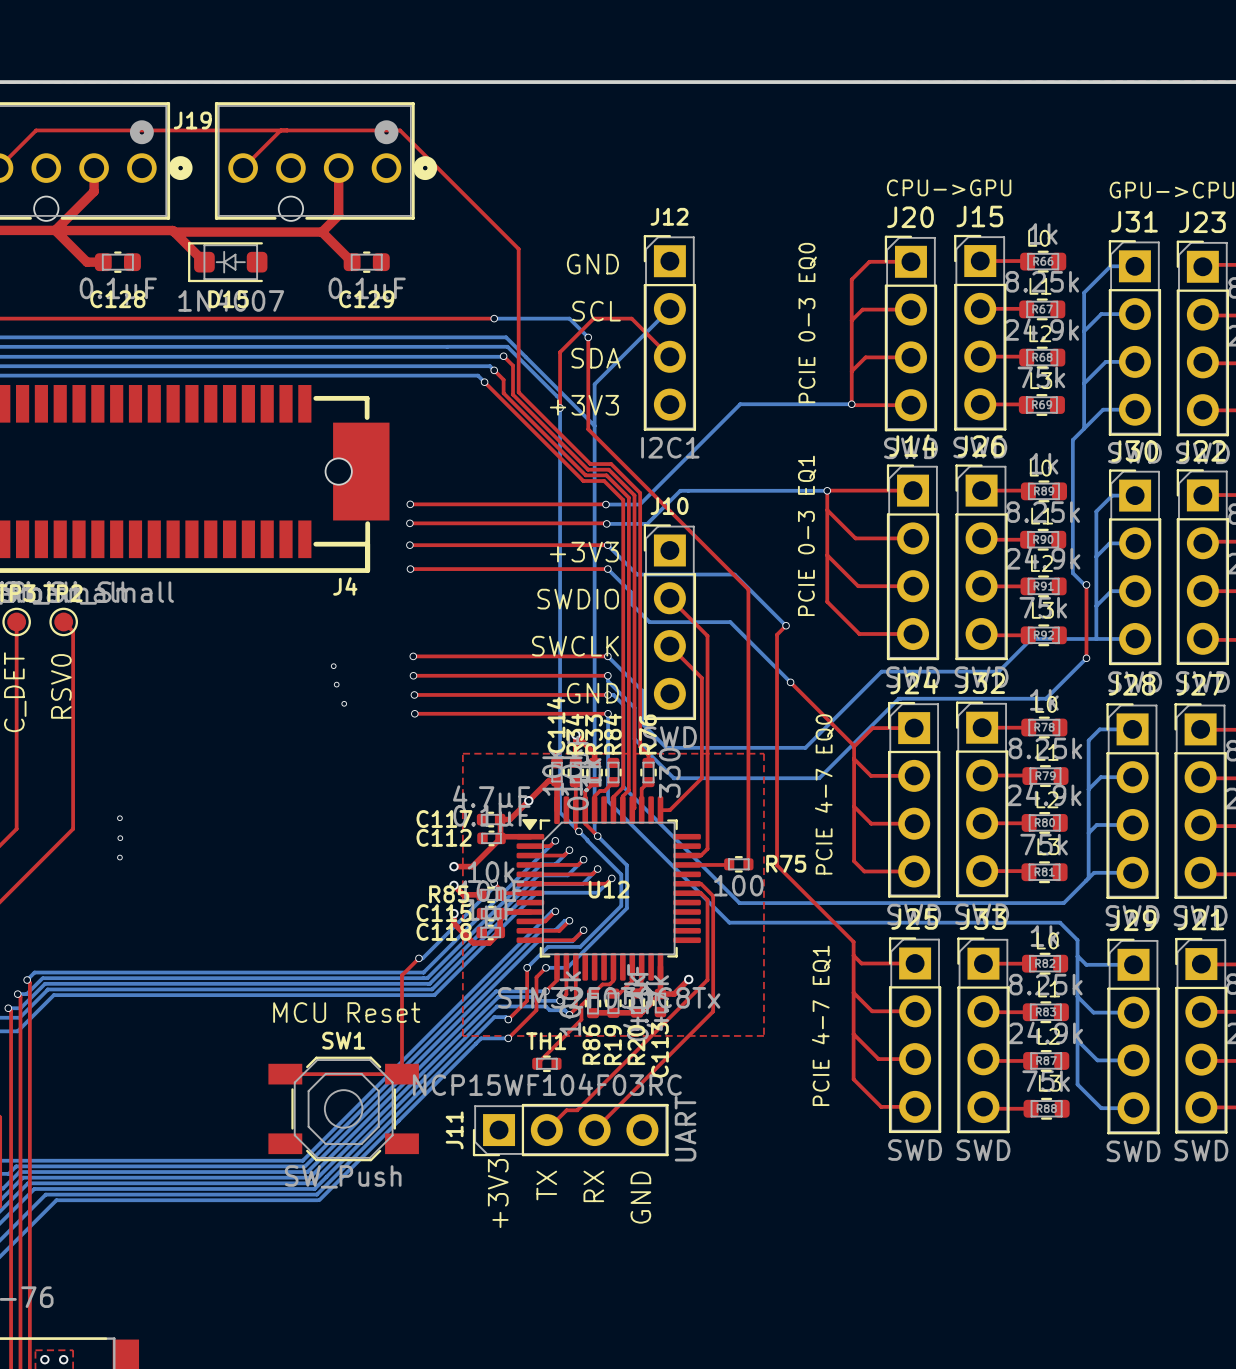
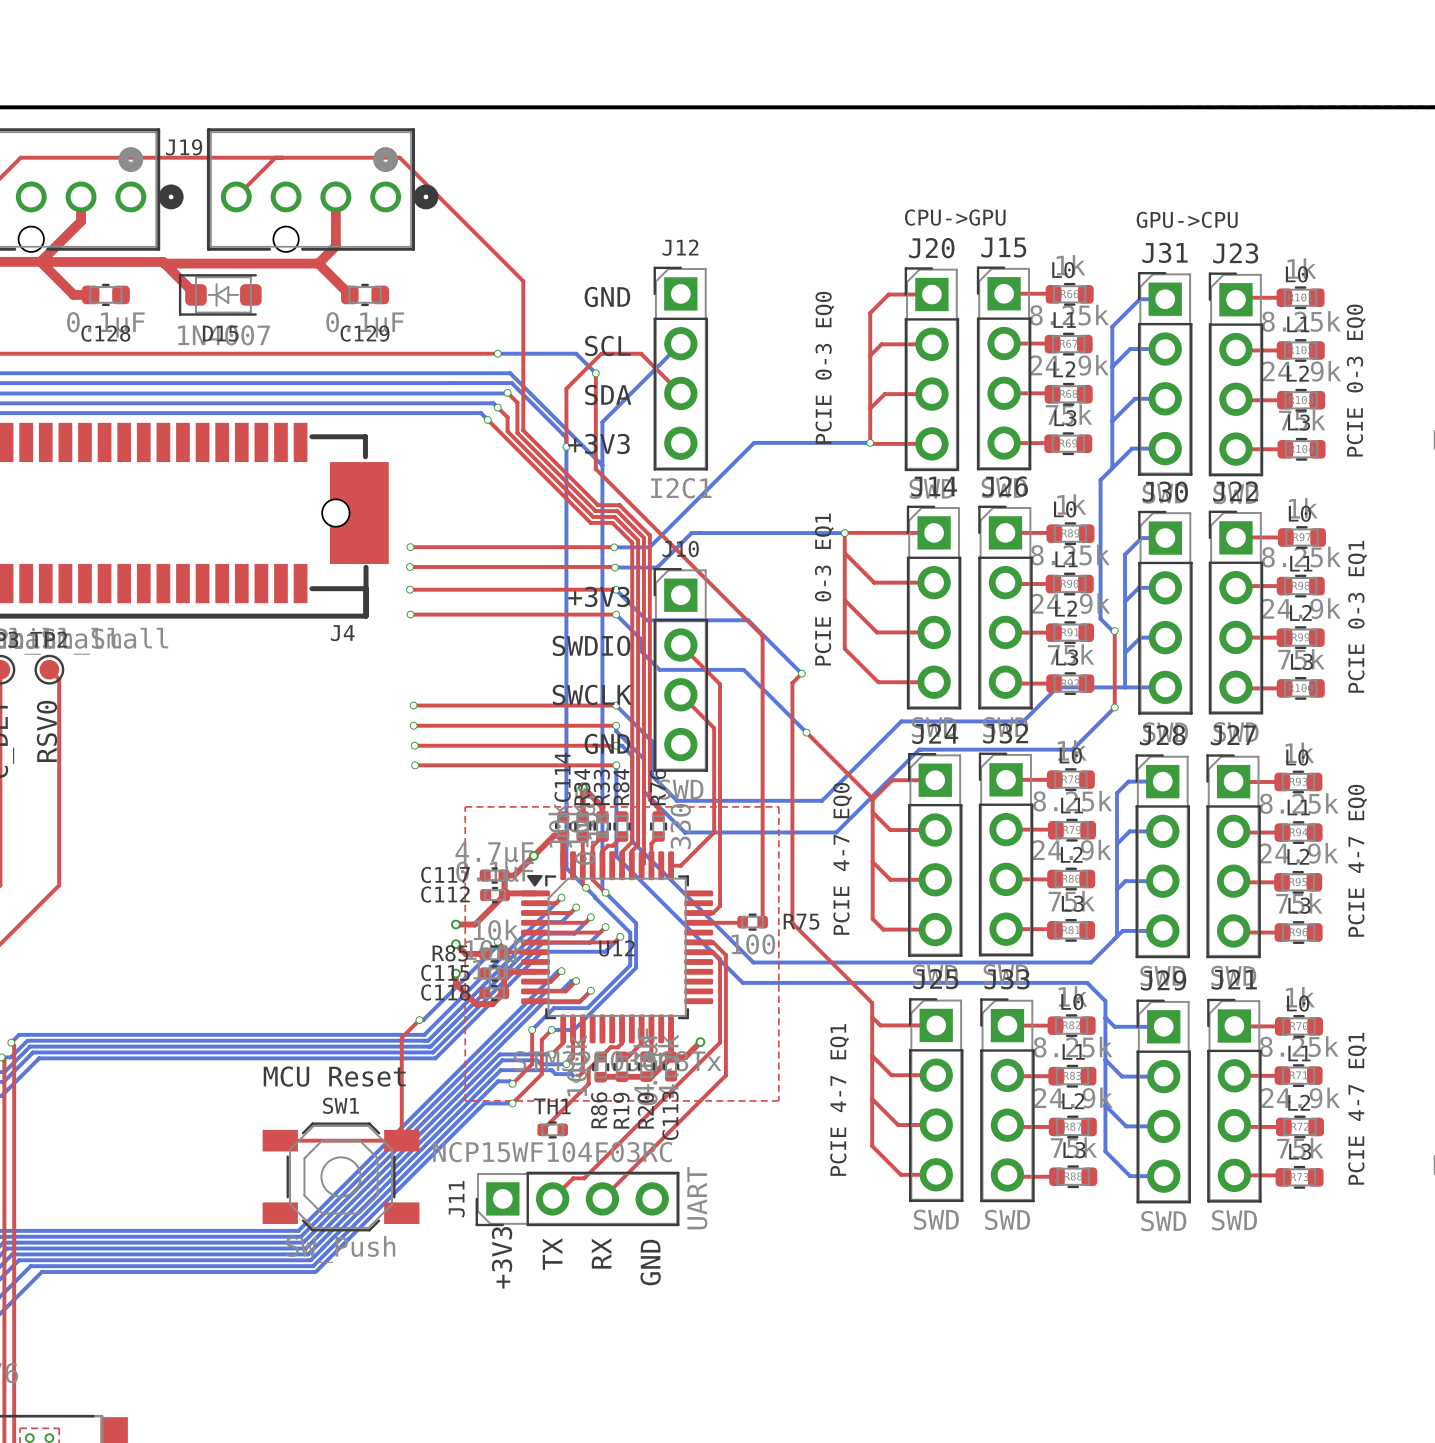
via: (333, 666) -> none
via: (336, 684) -> none
via: (344, 703) -> none
via: (119, 818) -> none
via: (120, 838) -> none
via: (119, 857) -> none

